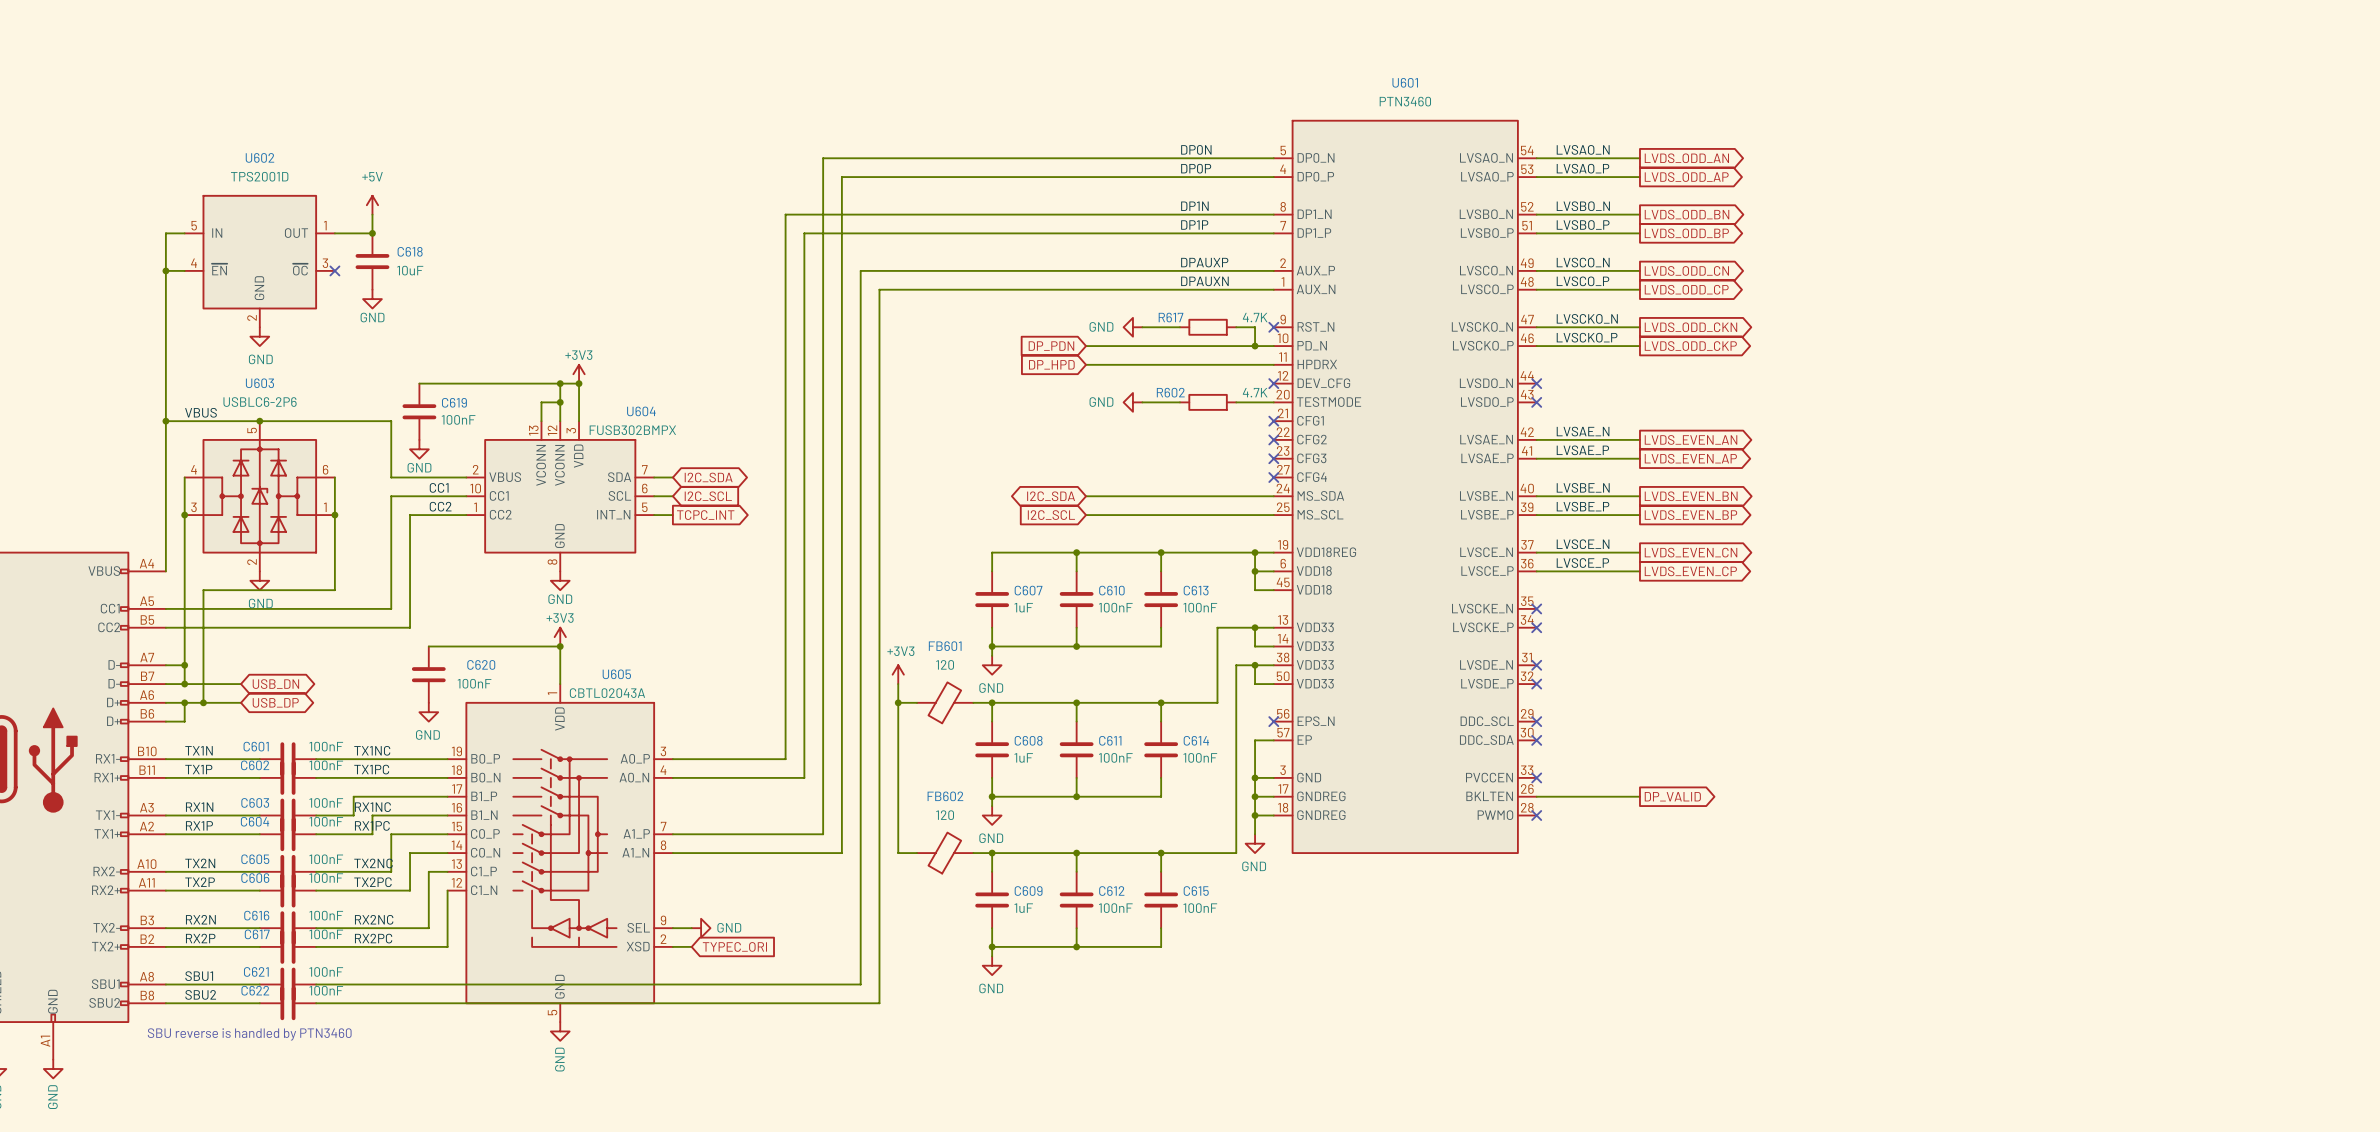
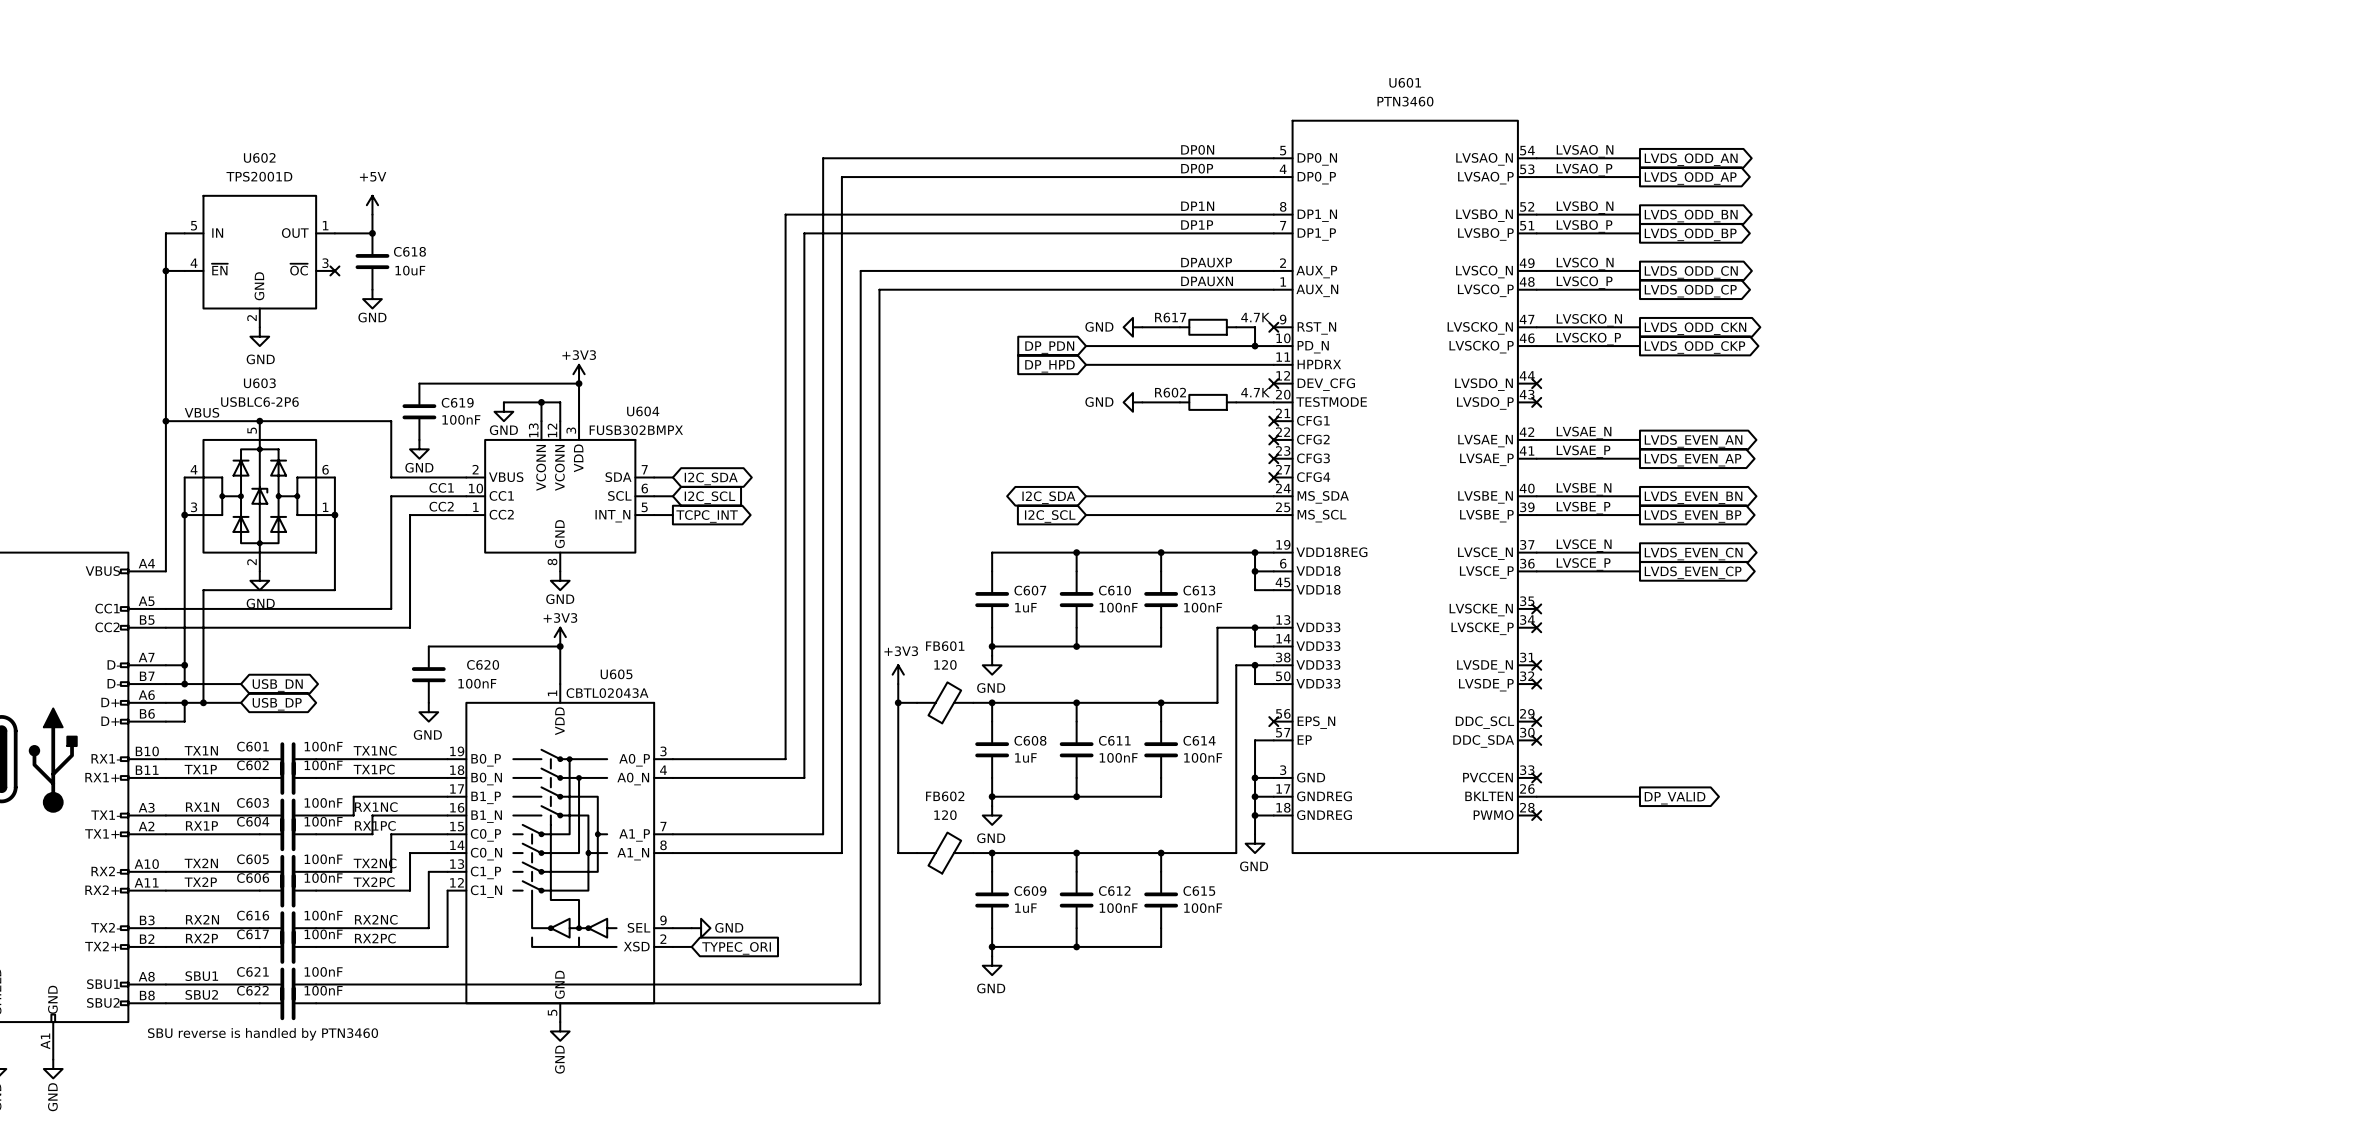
wire: (560, 383) (560, 402) -> none
junction: (560, 383) -> none
wire: none -> (503, 402) (541, 402)
junction: none -> (541, 402)
junction: (560, 402) -> none
power symbol: none -> GND (503, 411)

